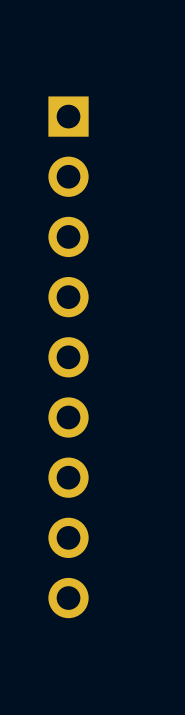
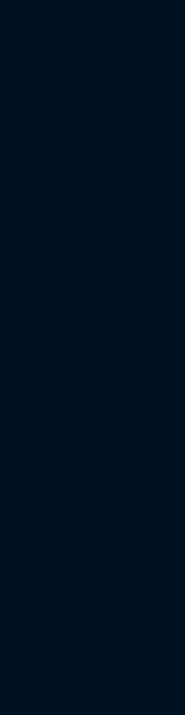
part: (68, 357) -> none

